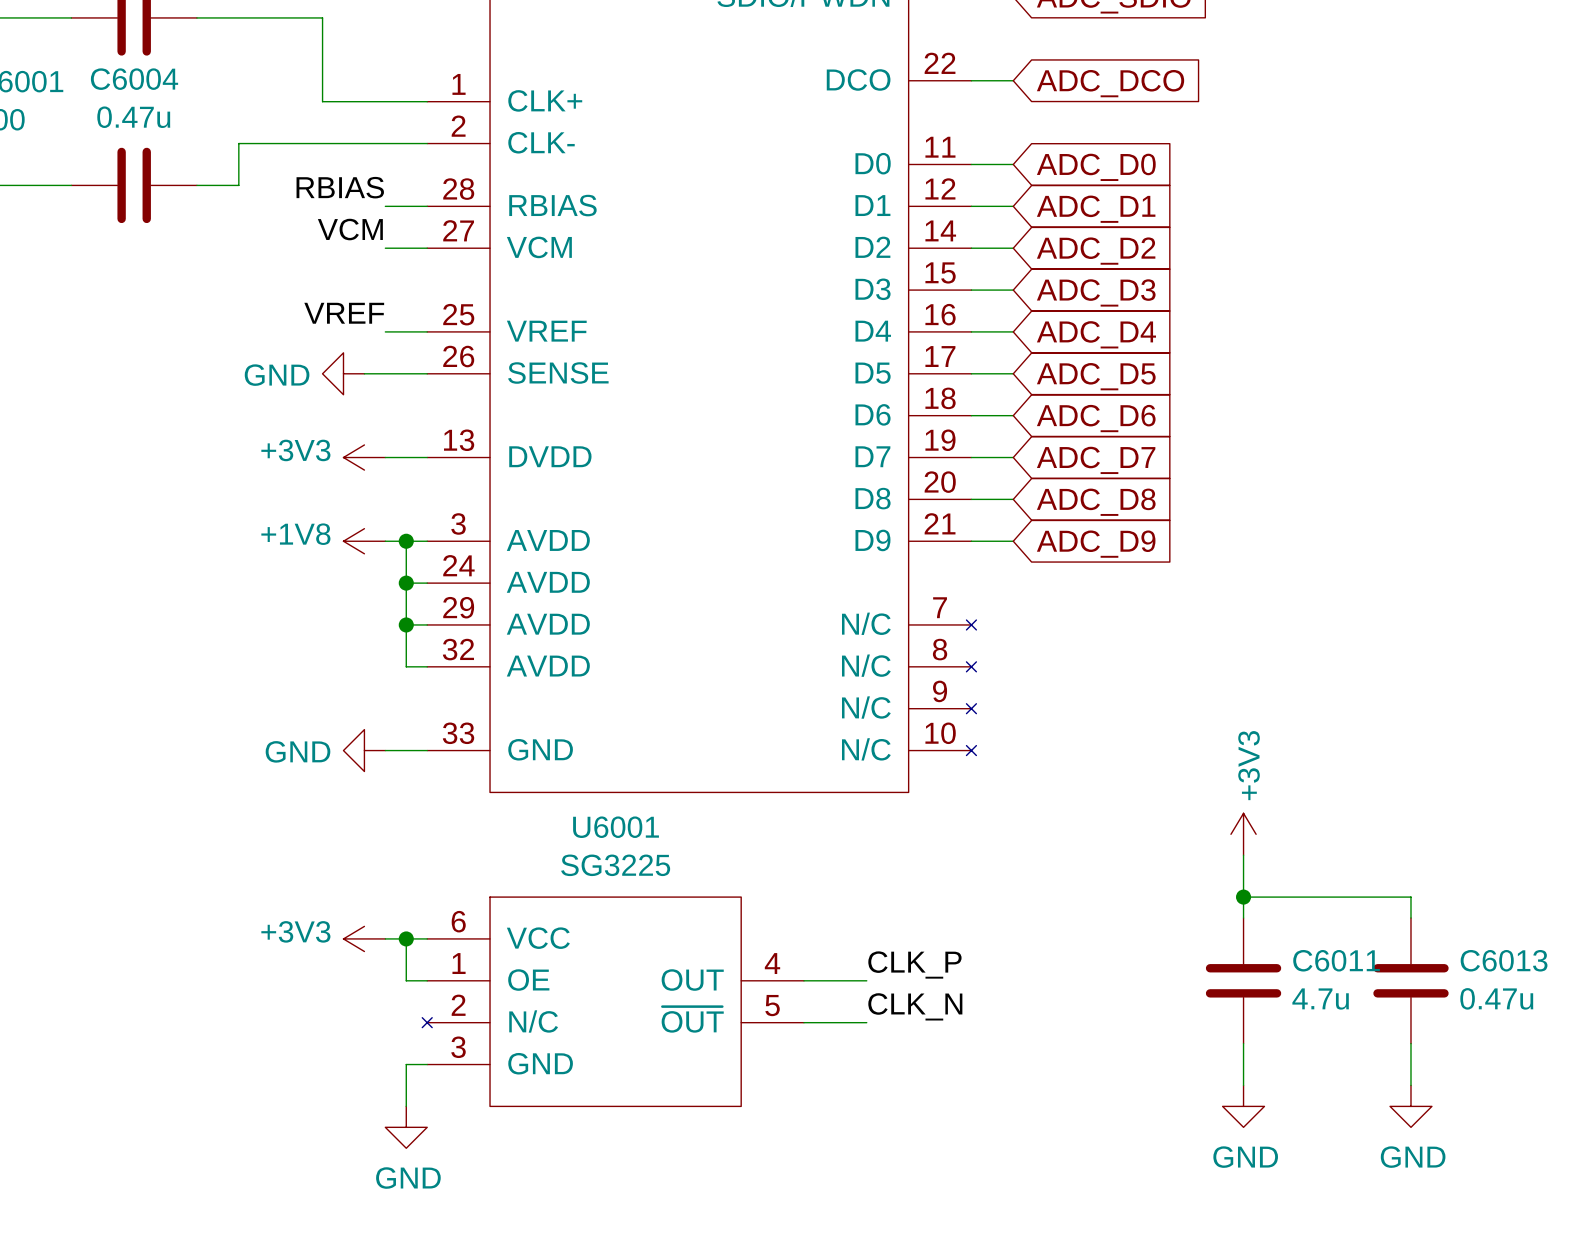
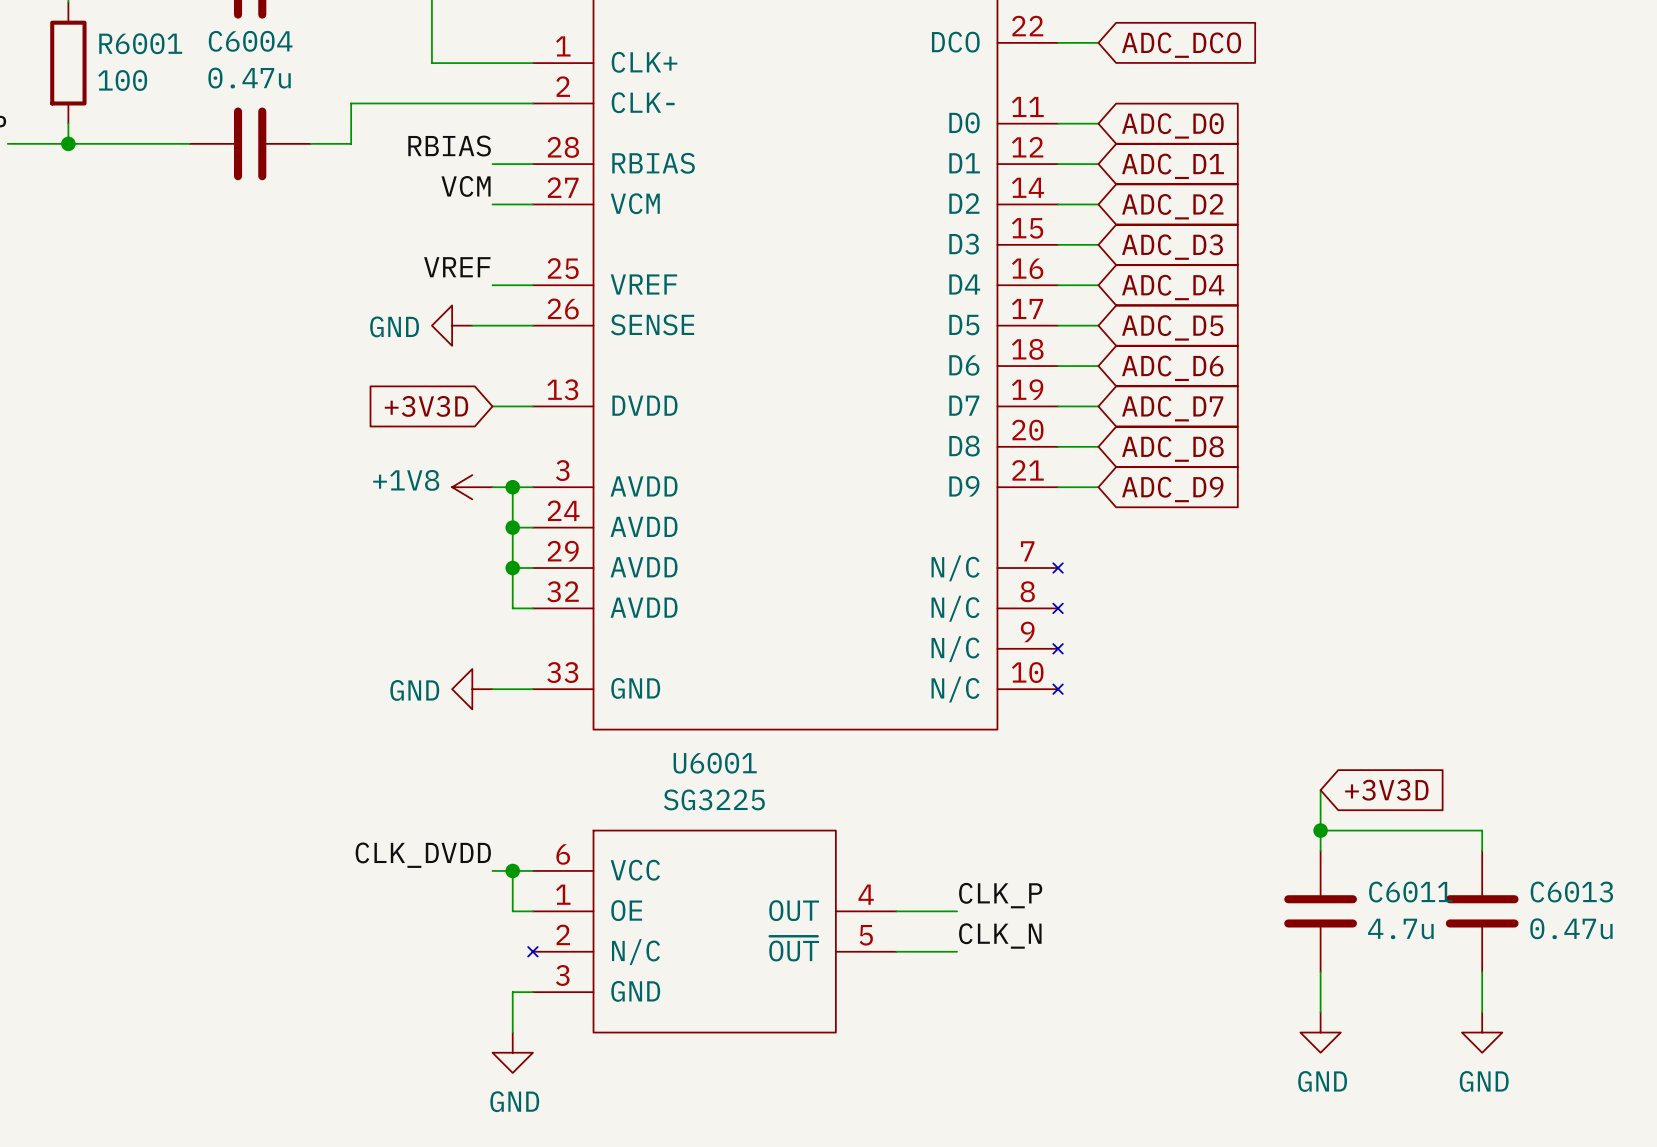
global label: none -> +3V3D (426, 406)
power symbol: +3V3 (364, 457) -> none
power symbol: +3V3 (1243, 834) -> none
global label: none -> +3V3D (1386, 790)
label: none -> CLK_DVDD (423, 855)
power symbol: +3V3 (364, 938) -> none

